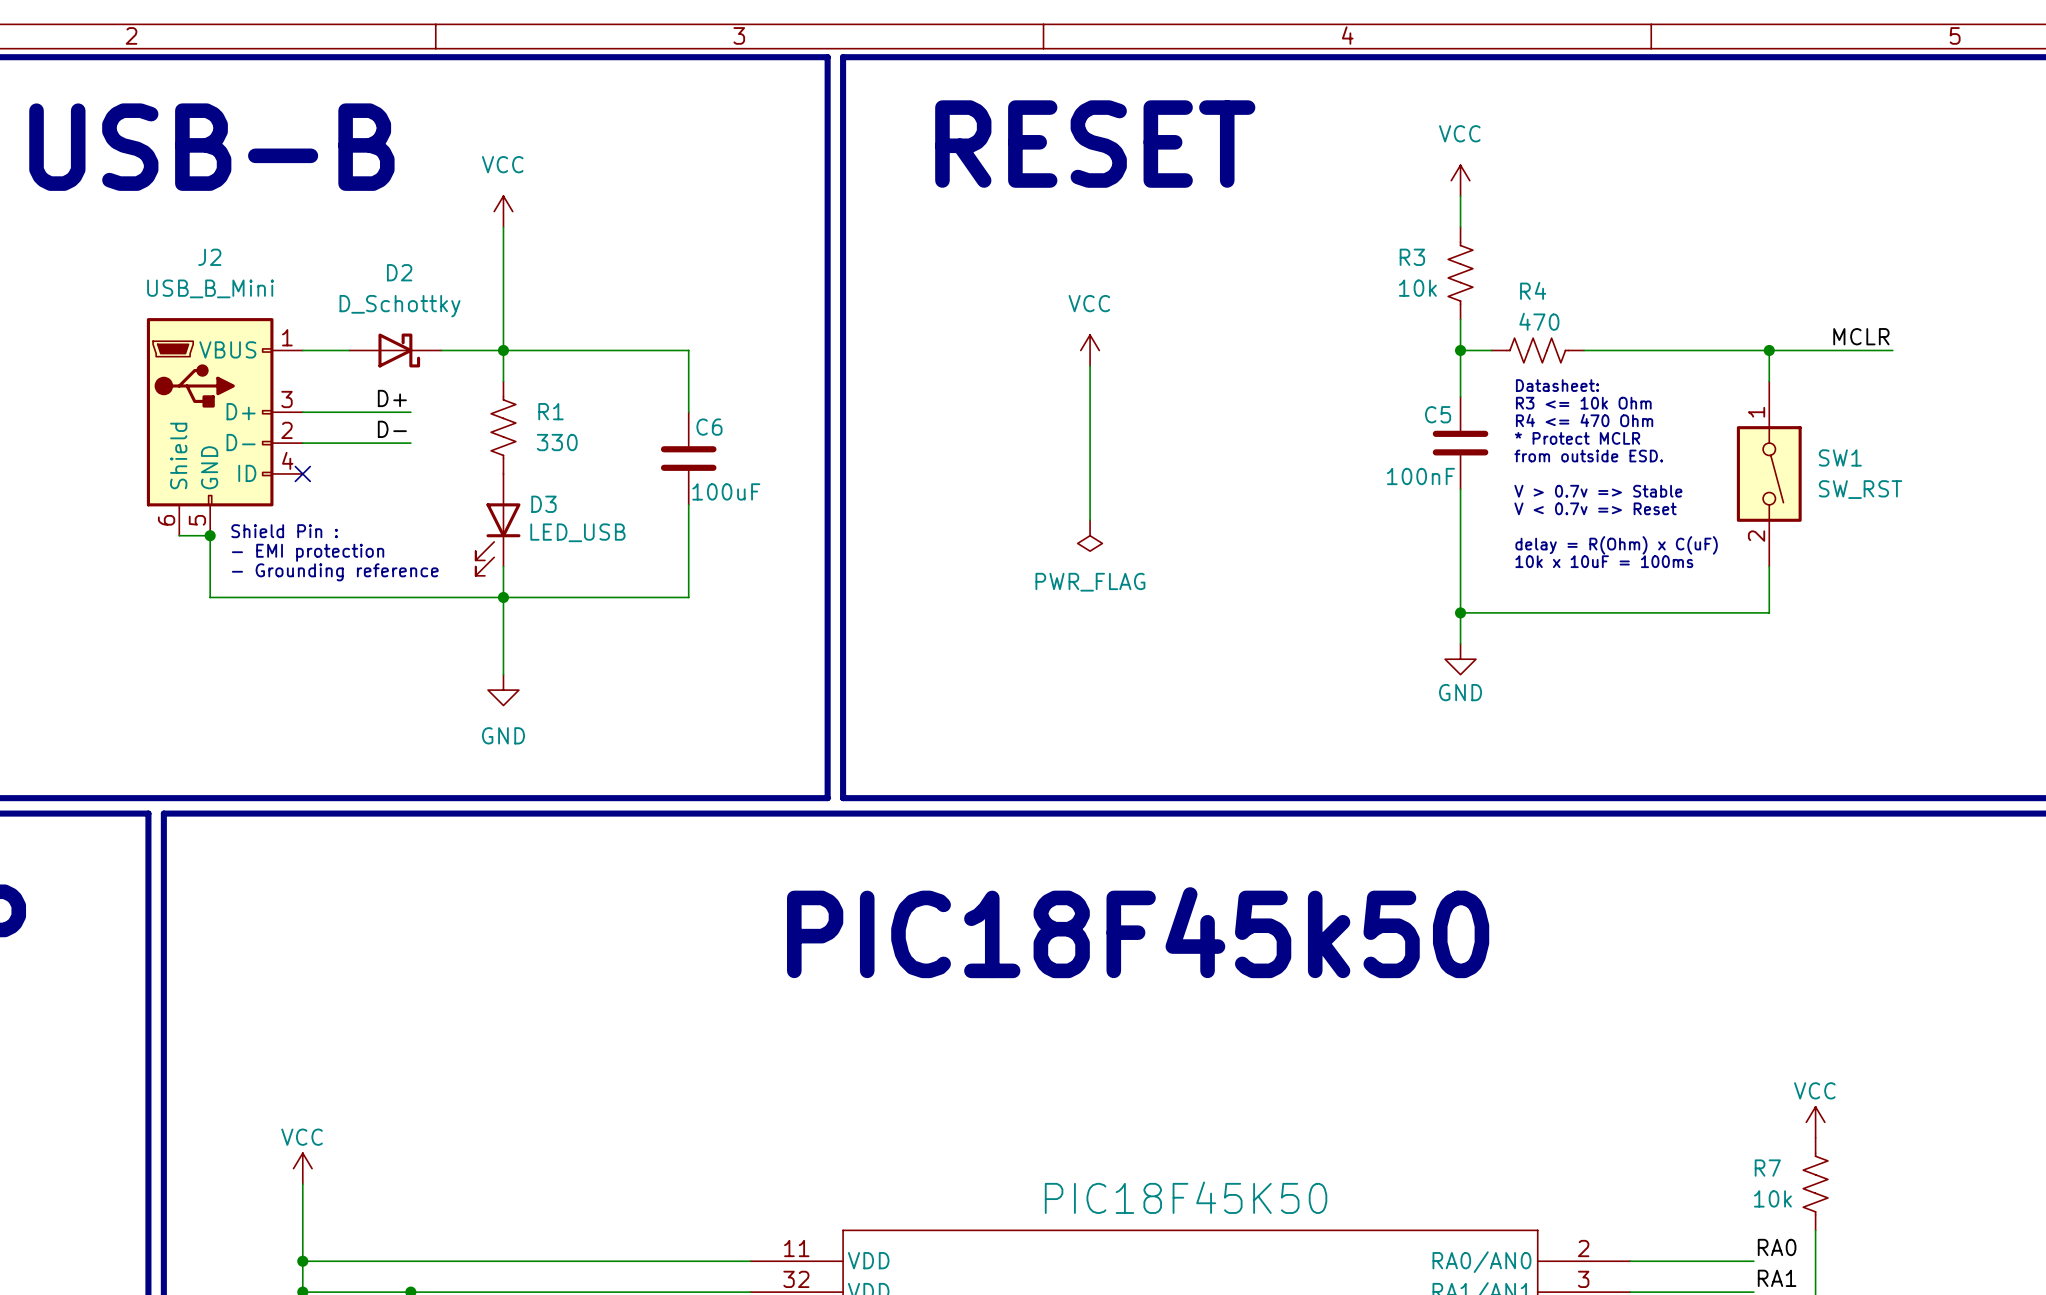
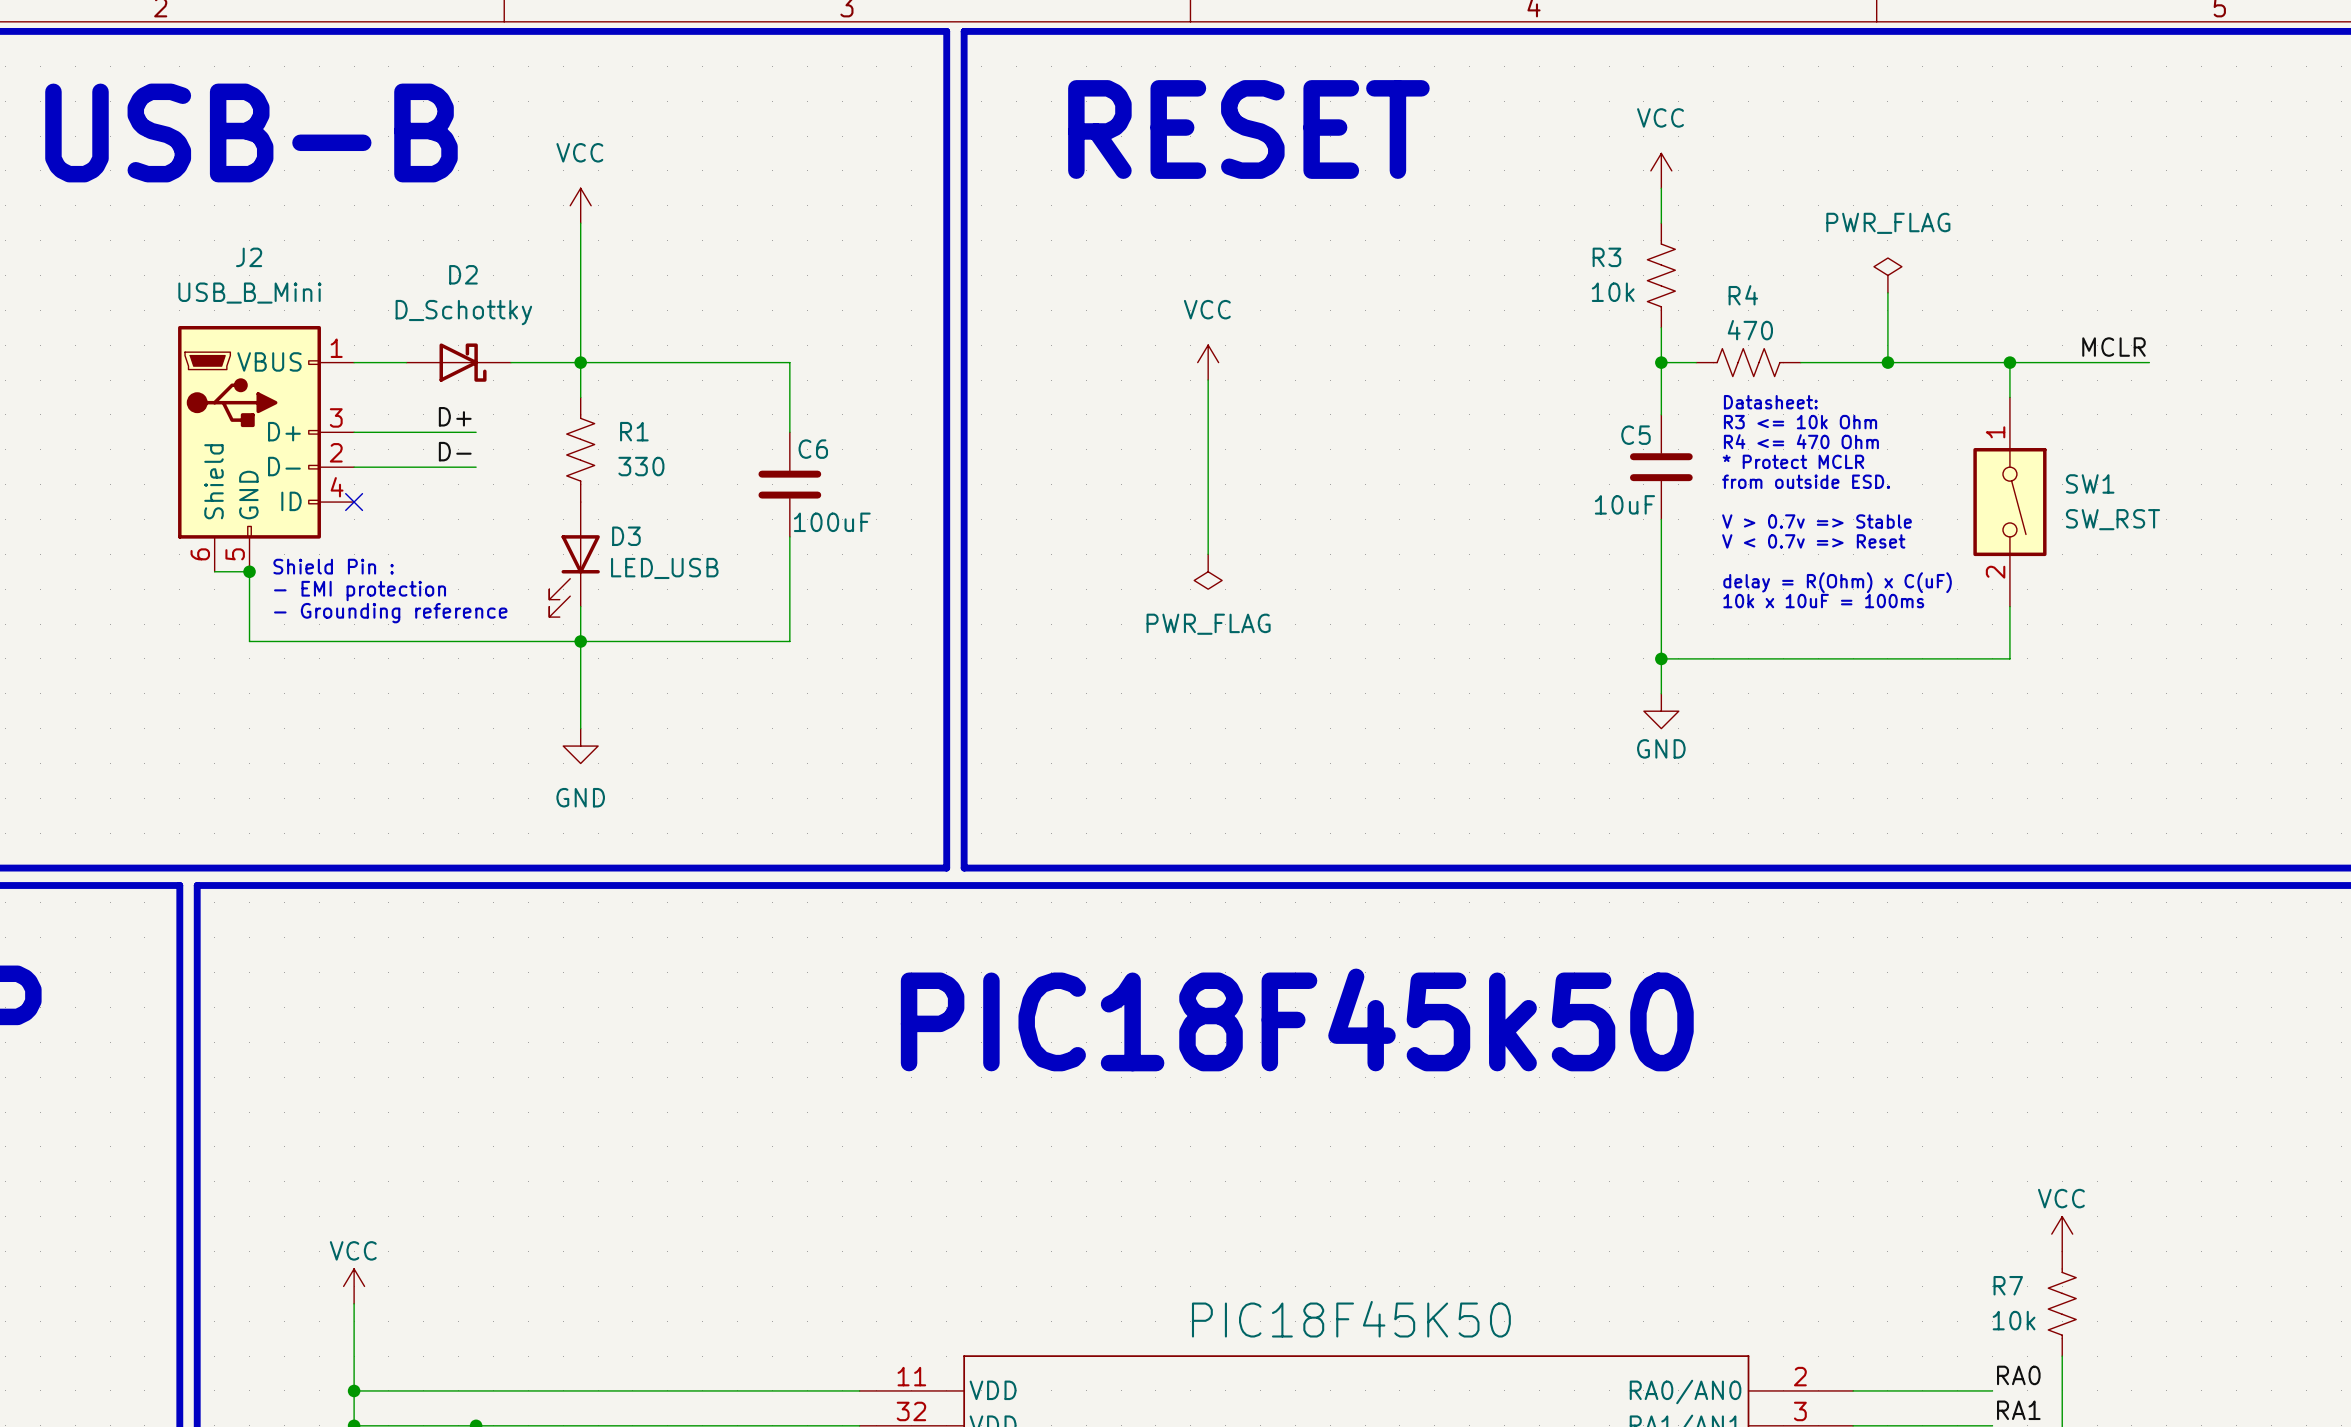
power symbol: none -> PWR_FLAG (1887, 275)
wire: none -> (1887, 292) (1887, 362)
power symbol position: VCC (1090, 350) -> VCC (1208, 362)
junction: none -> (1887, 362)
wire: (1090, 365) (1090, 520) -> (1208, 380) (1208, 554)
C5 value: 100nF (1420, 476) -> 10uF (1624, 504)
power symbol position: PWR_FLAG (1090, 535) -> PWR_FLAG (1208, 571)

